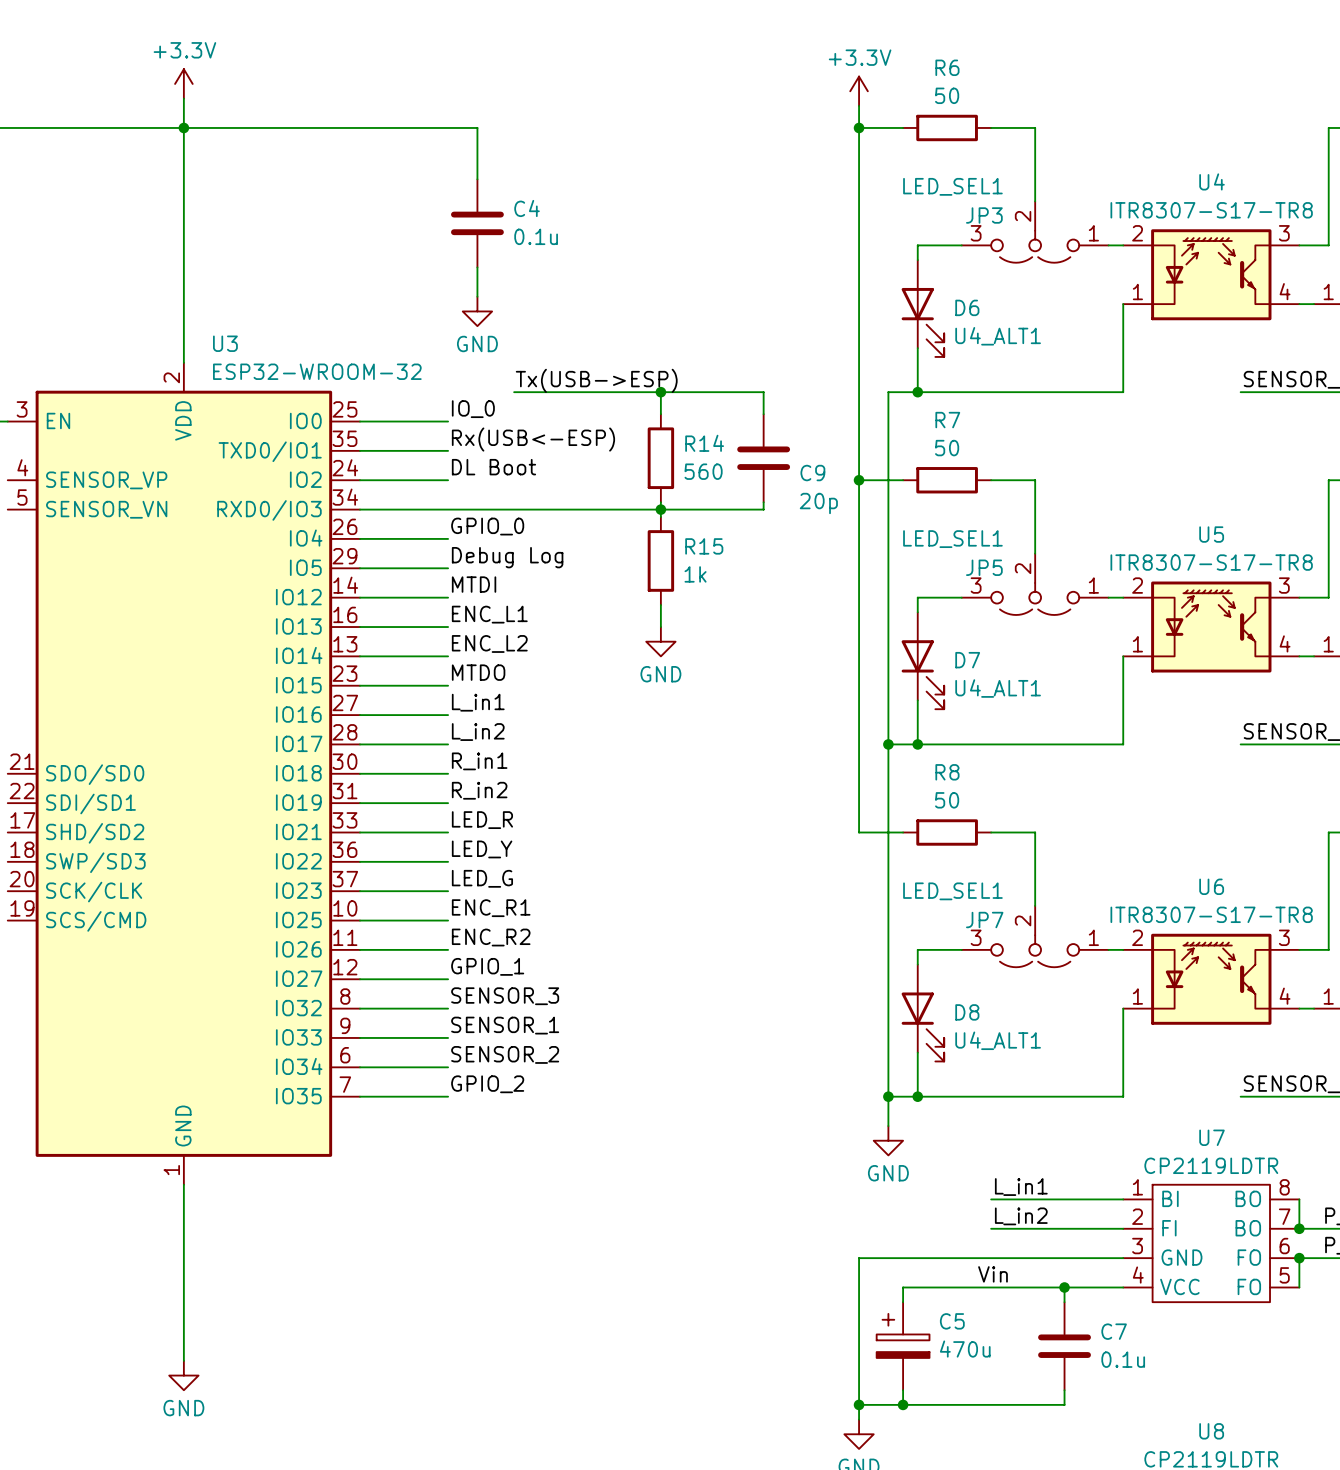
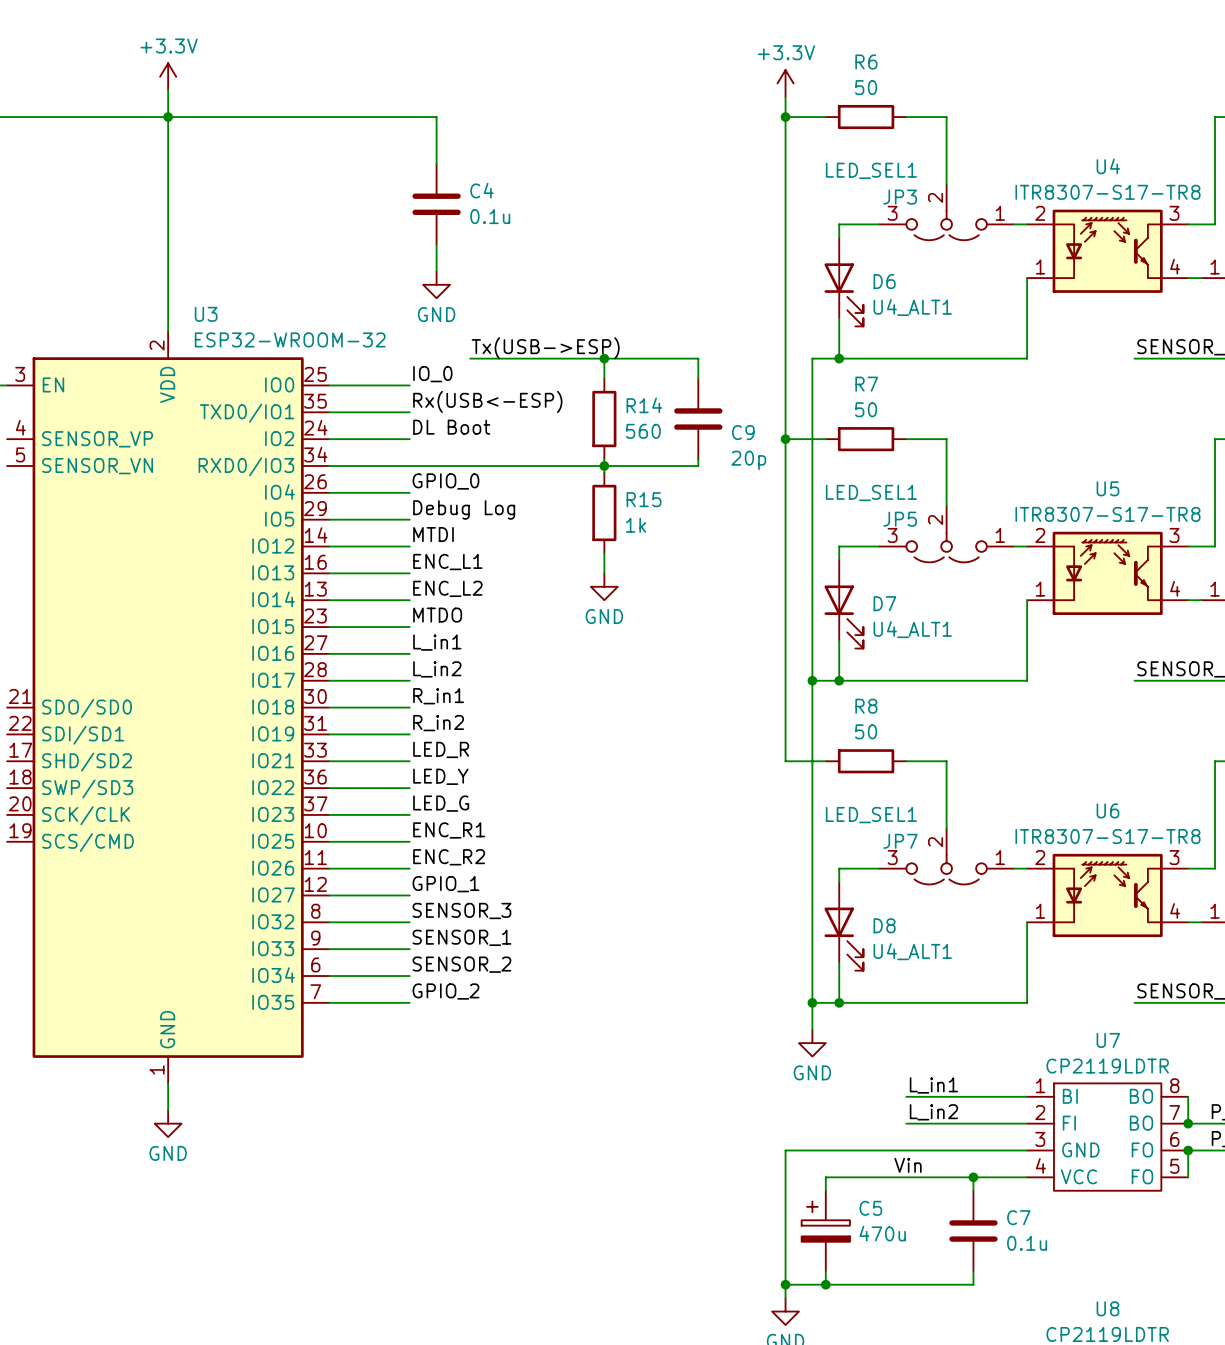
wire: (183, 1214) (183, 1360) -> none
power symbol position: GND (183, 1375) -> GND (168, 1123)

